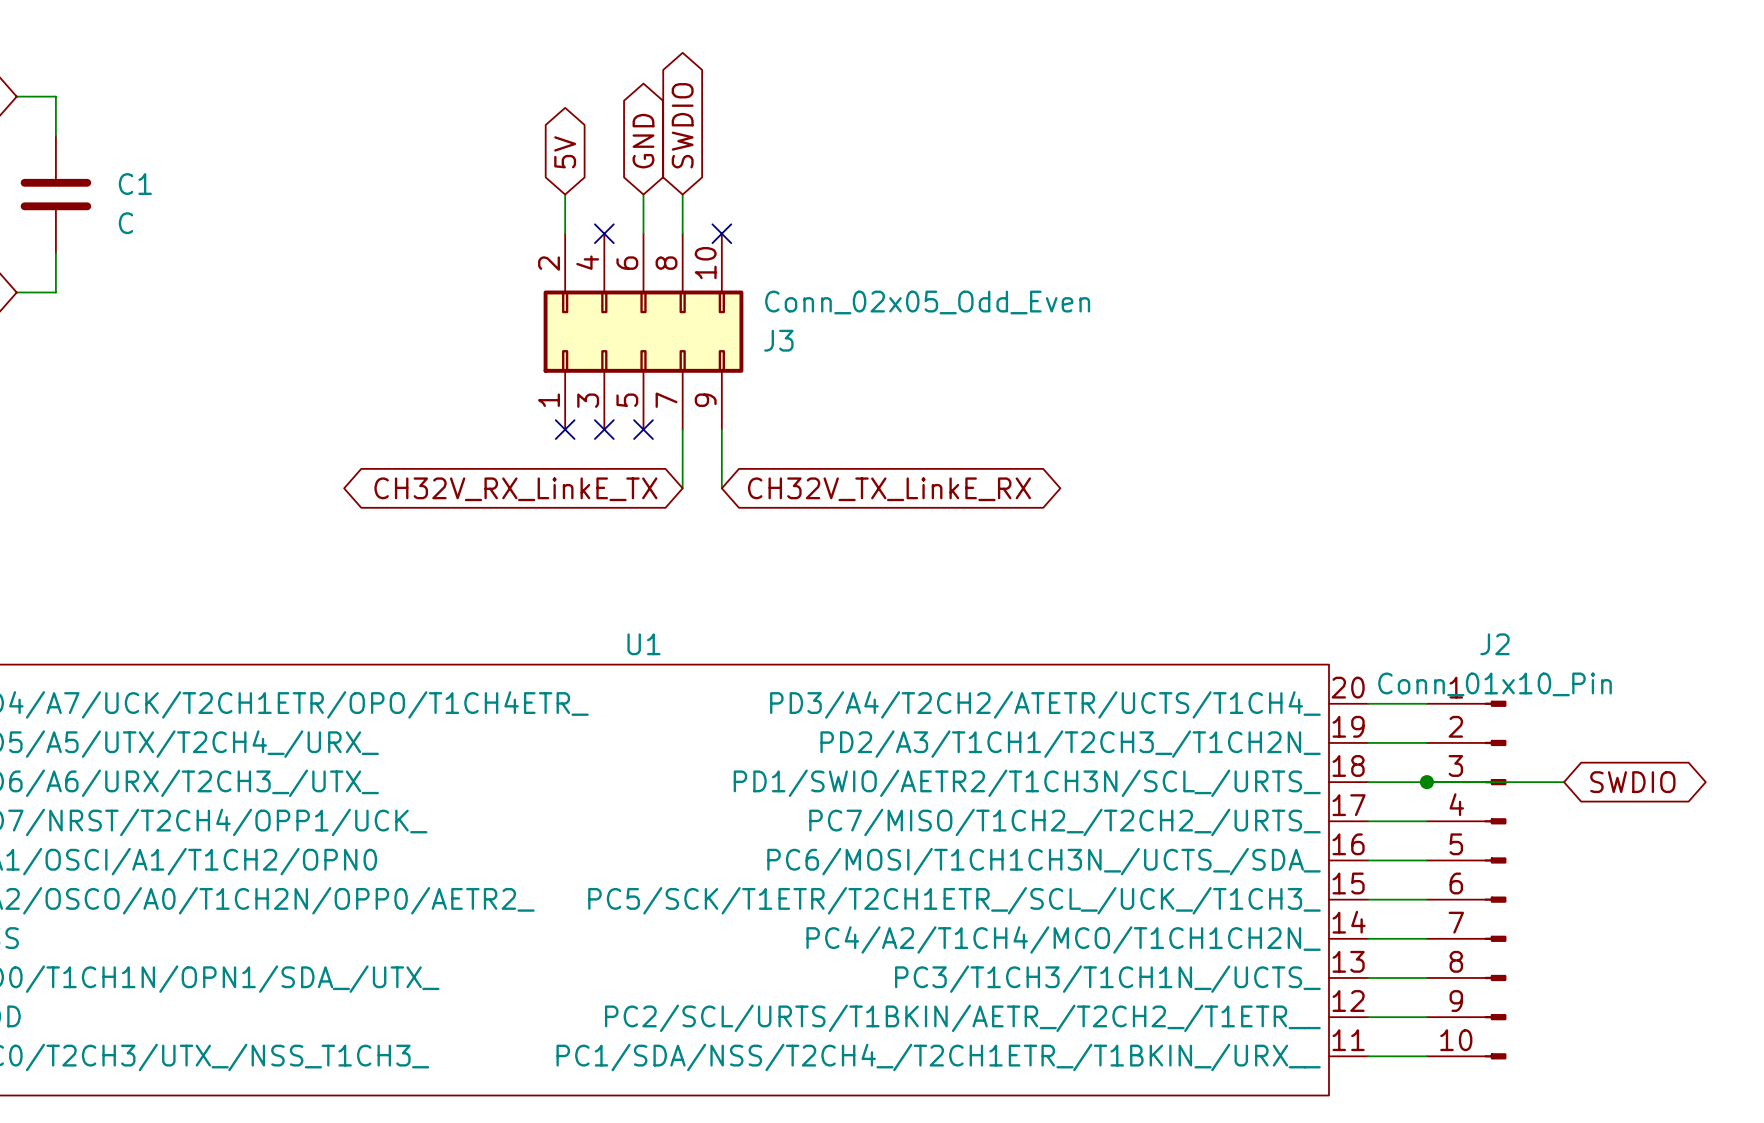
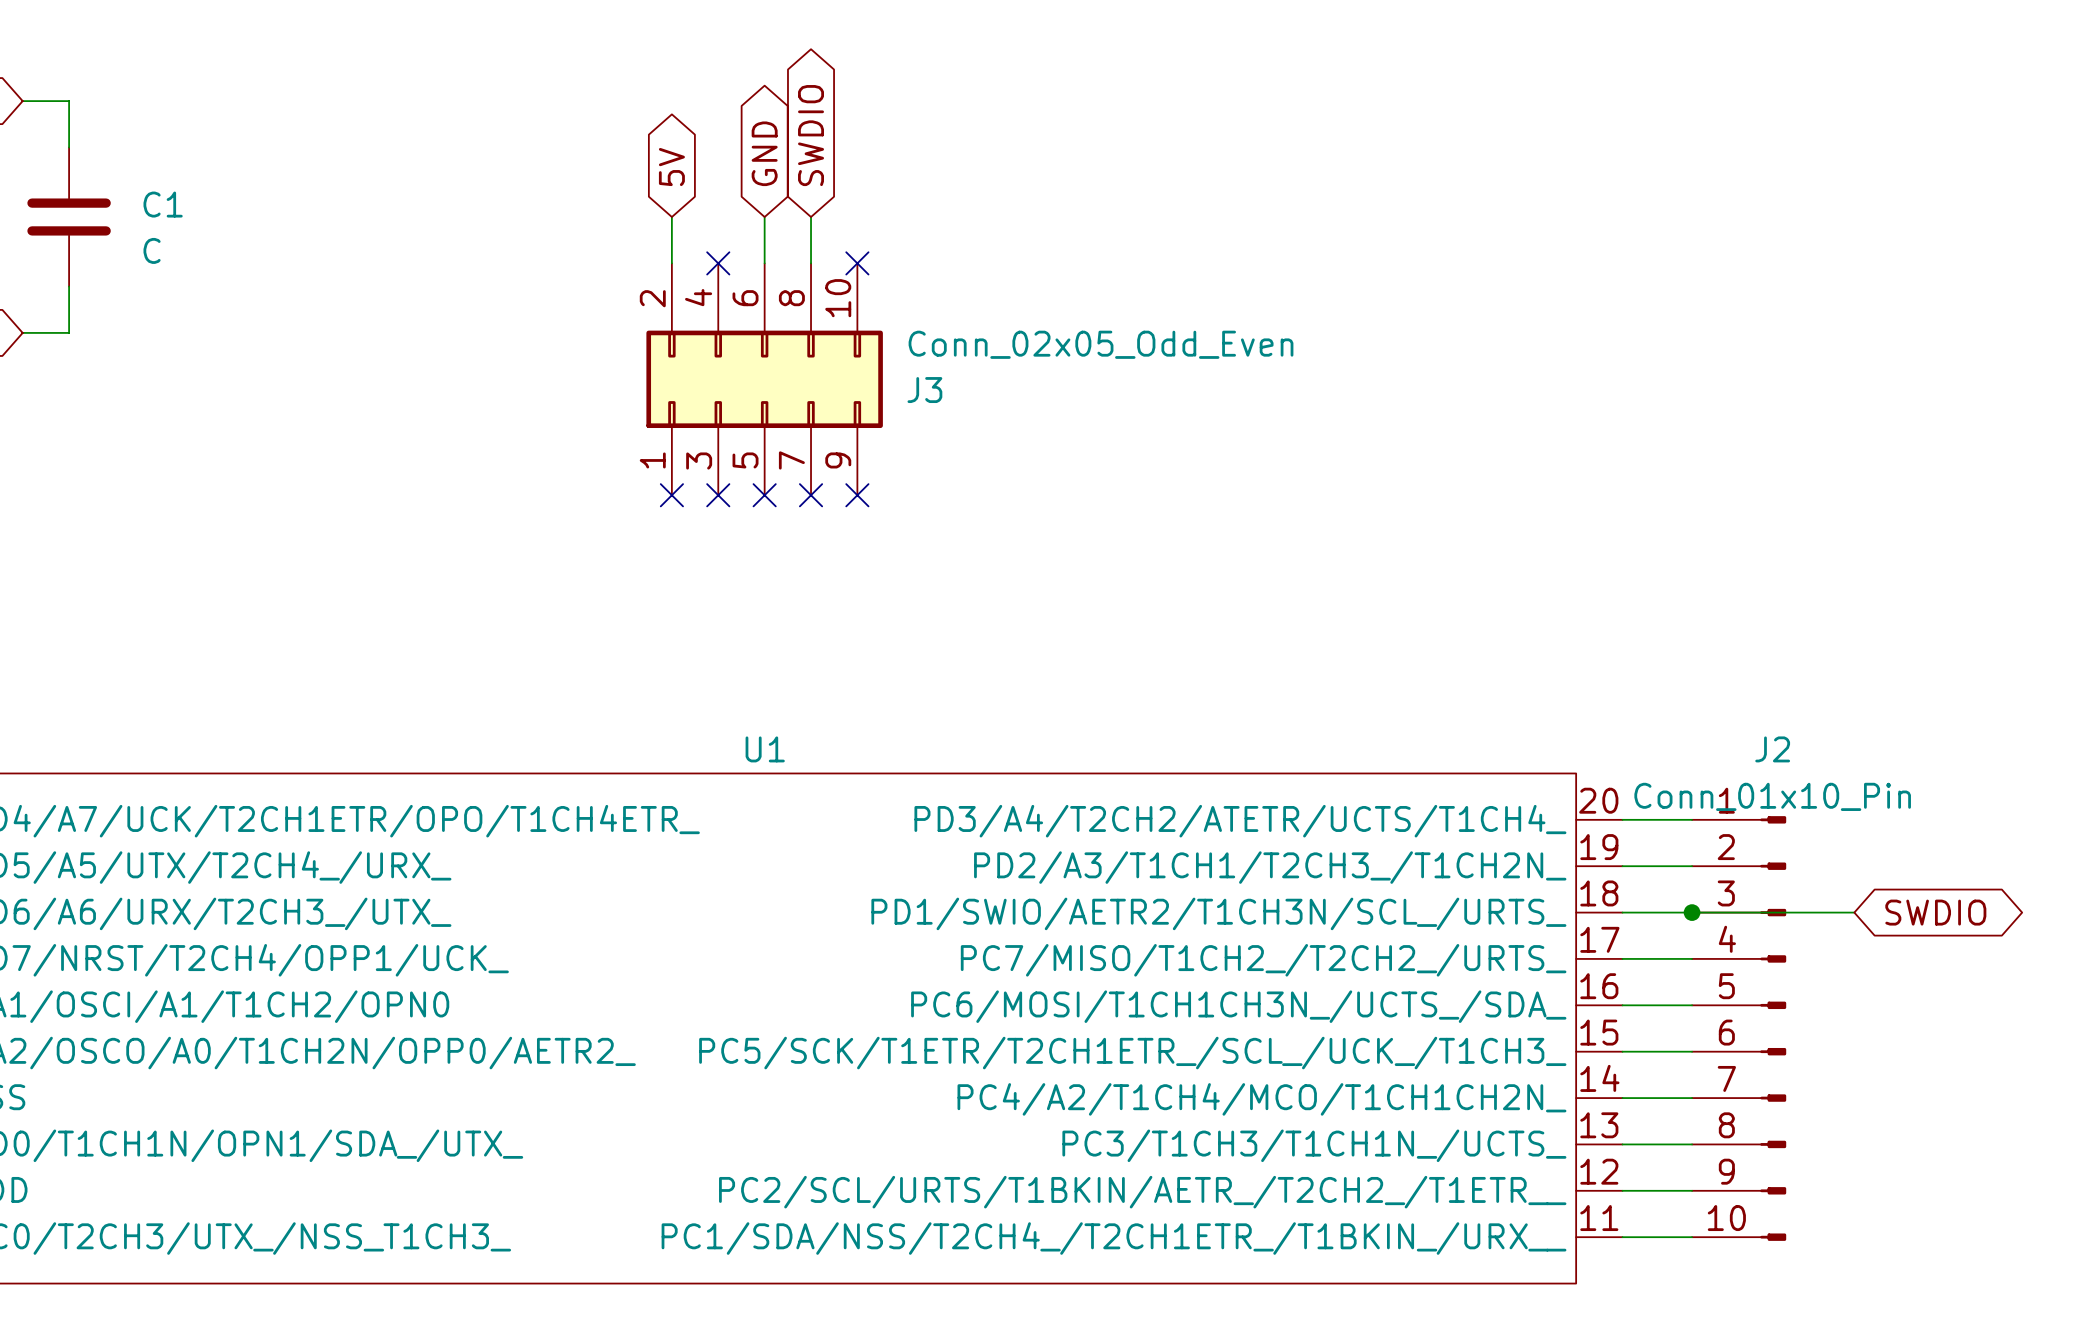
wire: (682, 429) (682, 488) -> none
no-connect mark: none -> (811, 495)
wire: (721, 429) (721, 488) -> none
no-connect mark: none -> (857, 495)
global label: CH32V_RX_LinkE_TX (515, 489) -> none
global label: CH32V_TX_LinkE_RX (889, 489) -> none

